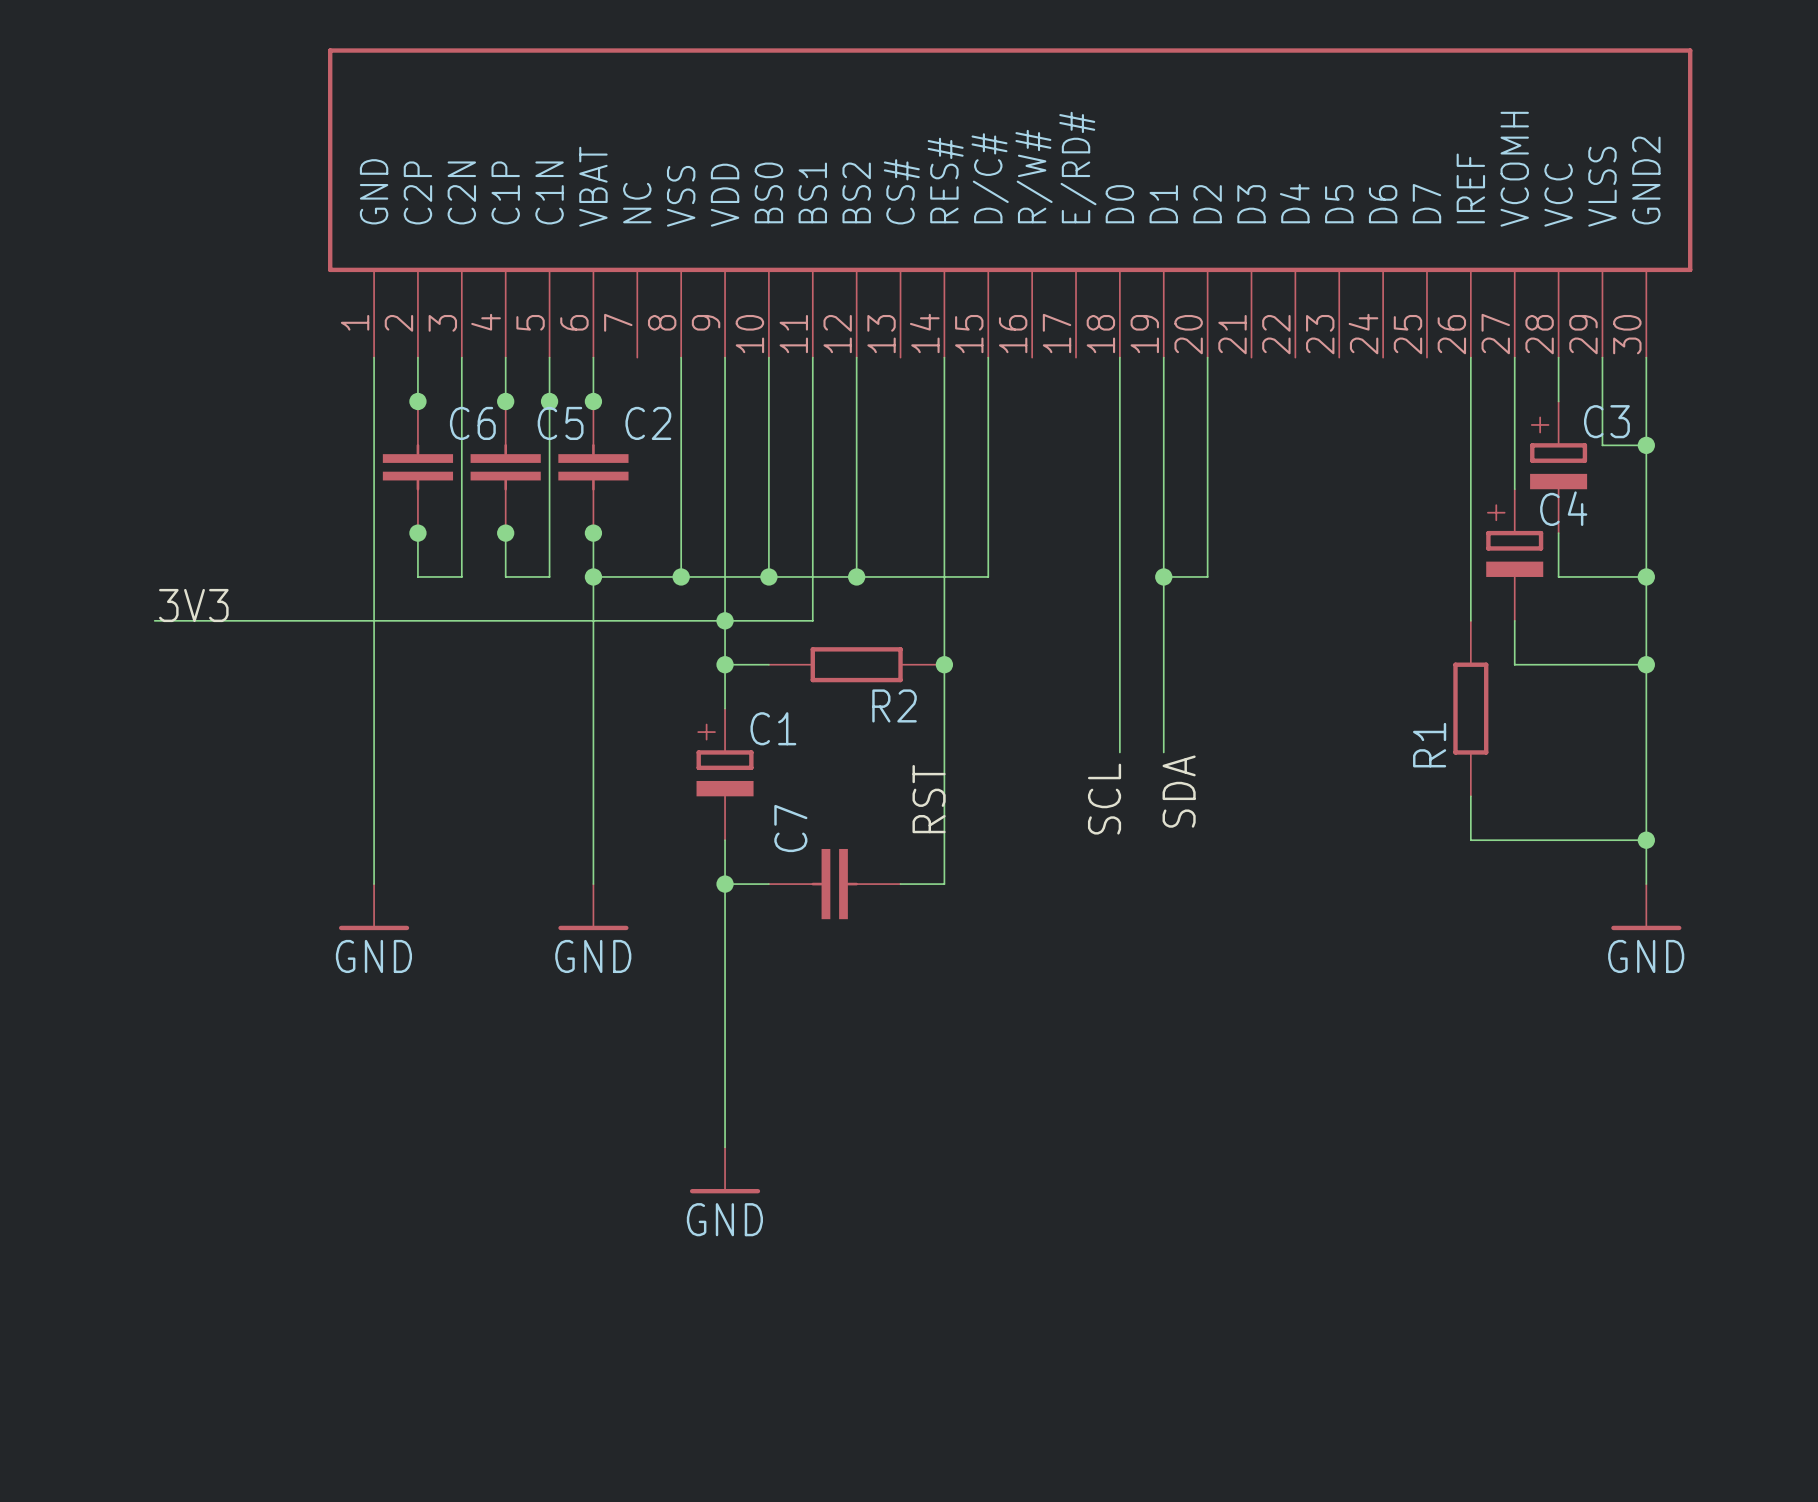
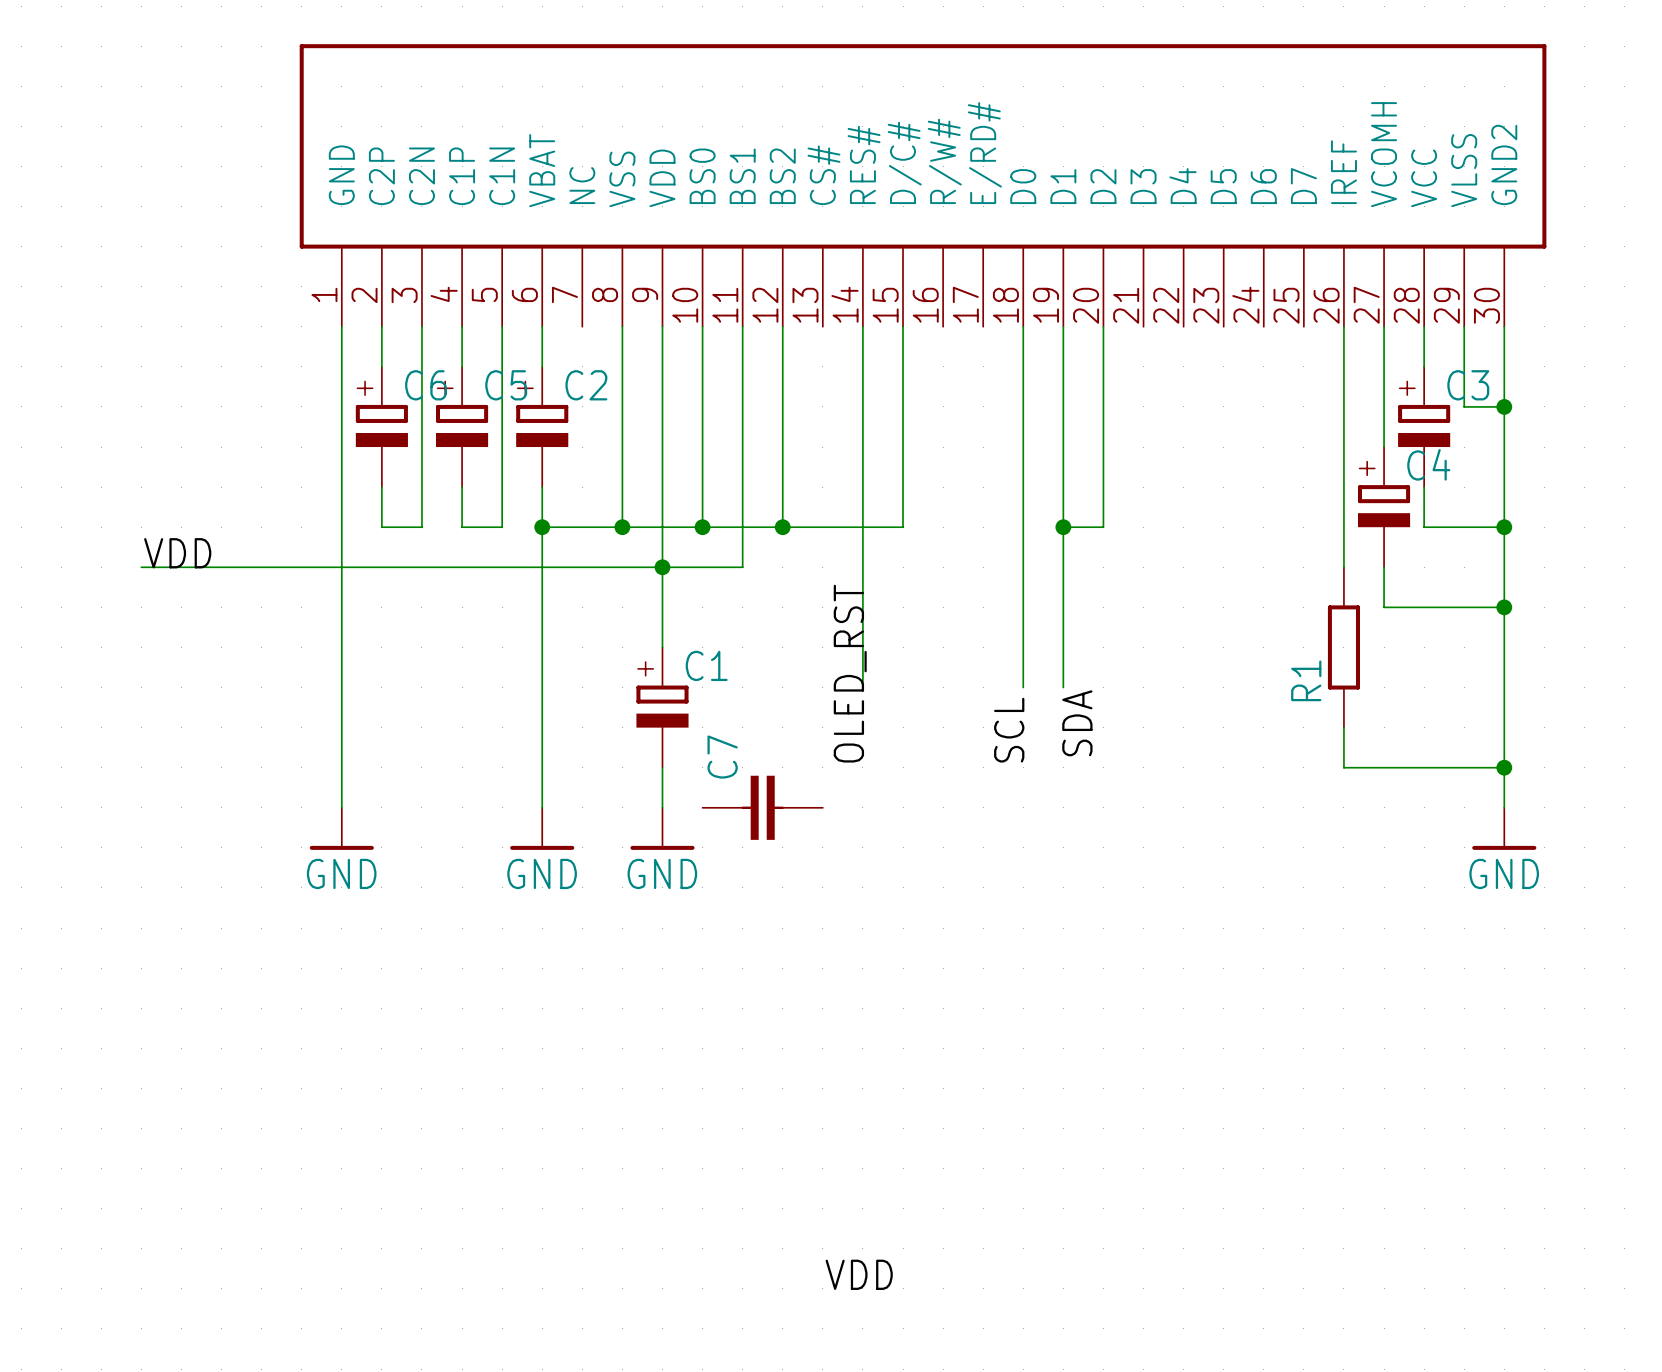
C6 symbol: [382, 401, 454, 534] -> [355, 366, 408, 488]
junction: (417, 401) -> none
C5 symbol: [470, 401, 541, 534] -> [436, 366, 489, 488]
junction: (505, 401) -> none
junction: (549, 401) -> none
C2 symbol: [558, 401, 629, 534] -> [516, 366, 569, 488]
junction: (593, 401) -> none
junction: (417, 533) -> none
junction: (505, 533) -> none
junction: (593, 533) -> none
label: 3V3 (193, 605) -> VDD (177, 553)
wire: (725, 664) (768, 664) -> none
junction: (725, 664) -> none
R2: (856, 664) -> none
junction: (944, 664) -> none
wire: (944, 752) (944, 884) (900, 884) -> none
label: RST (929, 799) -> OLED_RST (850, 673)
junction: (725, 884) -> none
wire: (768, 884) (725, 884) (725, 1147) -> none
power symbol position: GND (725, 1170) -> GND (662, 828)
label: none -> VDD (859, 1274)

